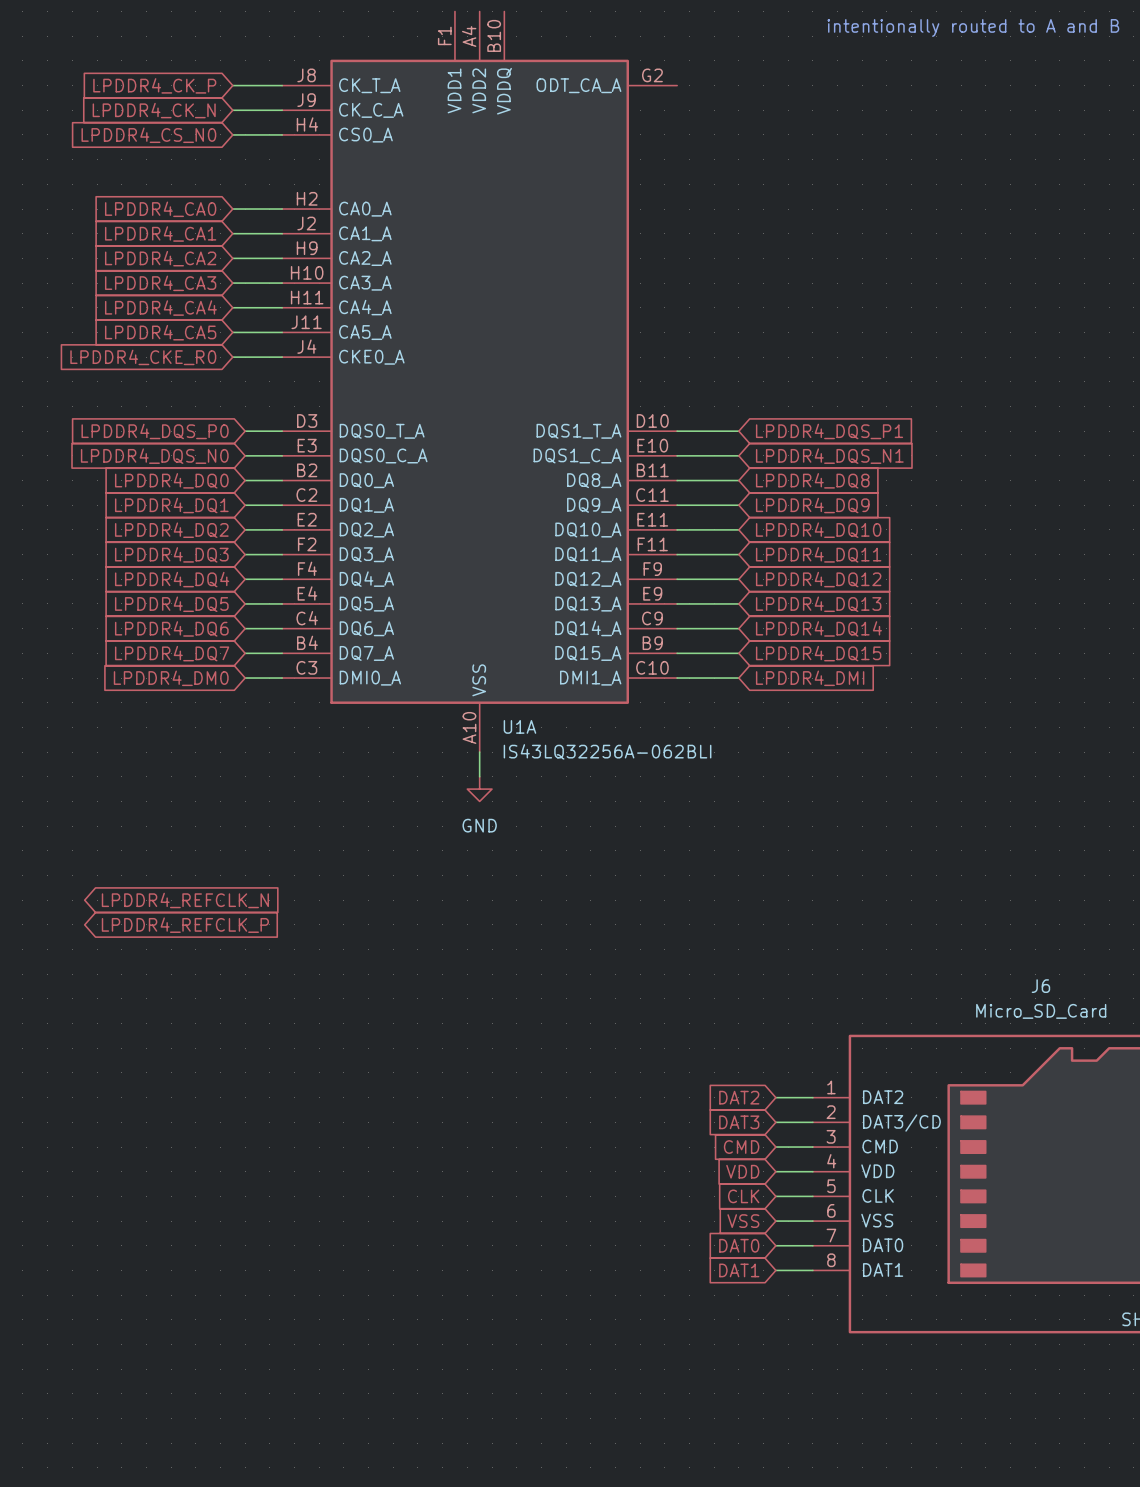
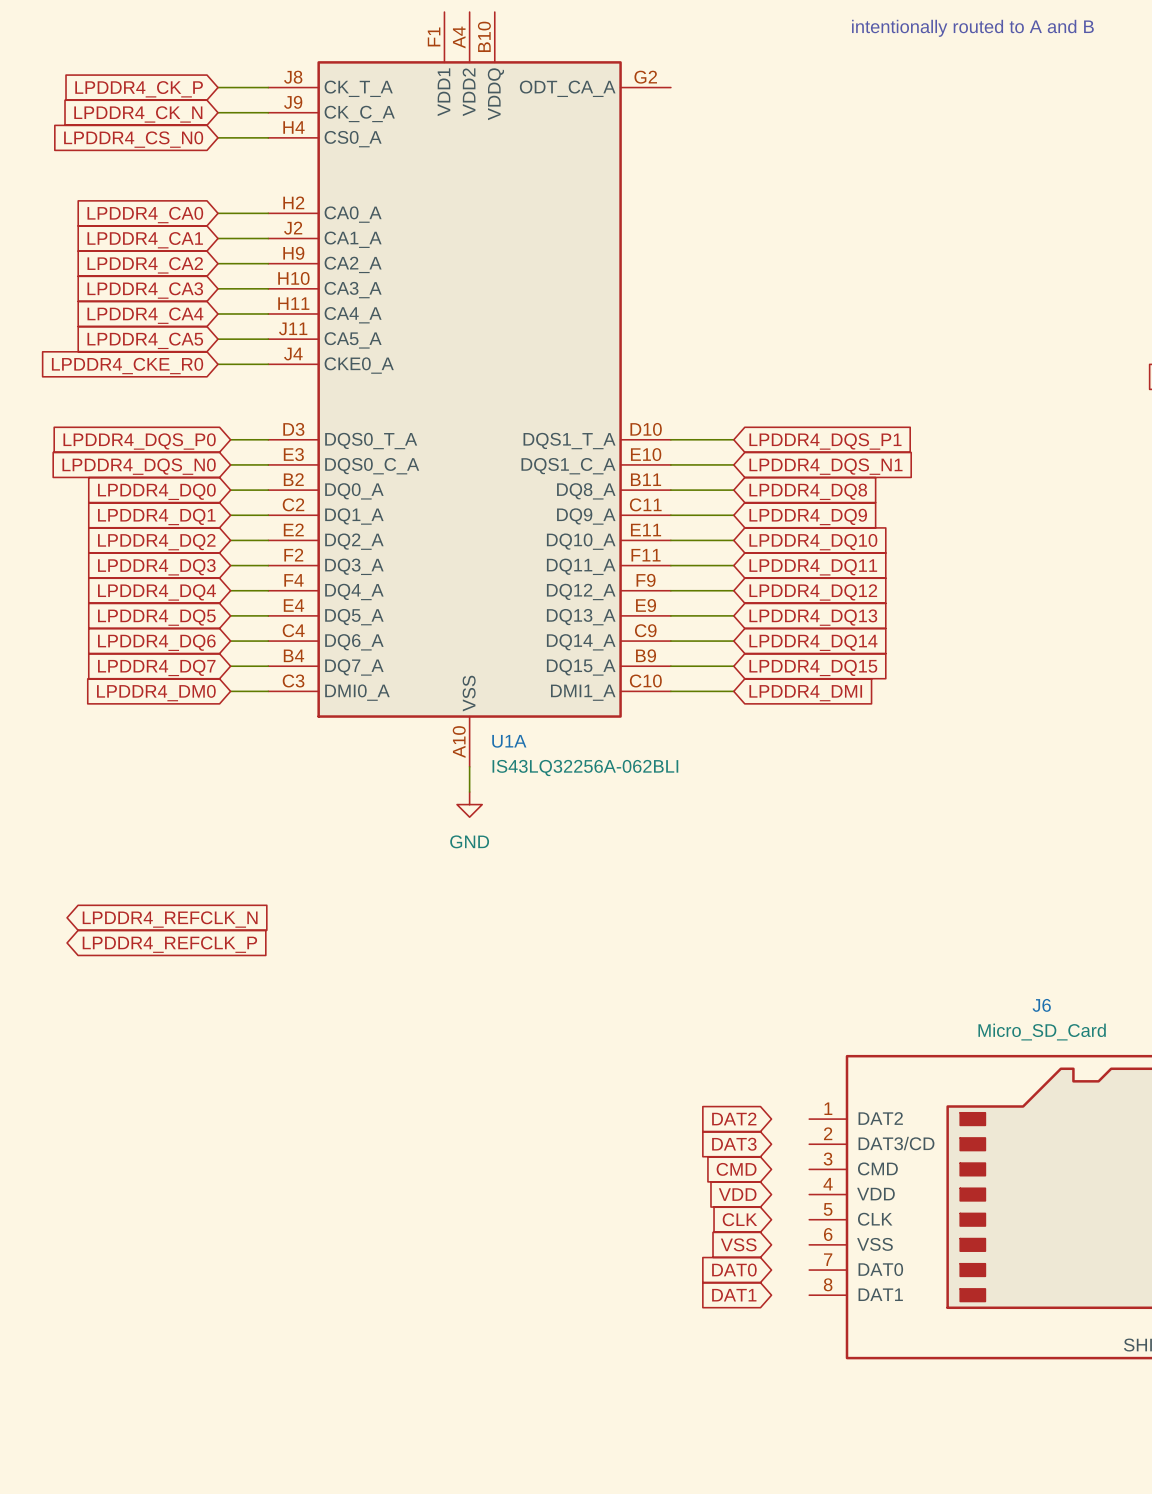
wire: (775, 1097) (812, 1097) -> none
wire: (775, 1122) (812, 1122) -> none
wire: (775, 1147) (812, 1147) -> none
wire: (775, 1171) (812, 1171) -> none
wire: (775, 1196) (812, 1196) -> none
wire: (775, 1221) (812, 1221) -> none
wire: (775, 1245) (812, 1245) -> none
wire: (775, 1270) (812, 1270) -> none

